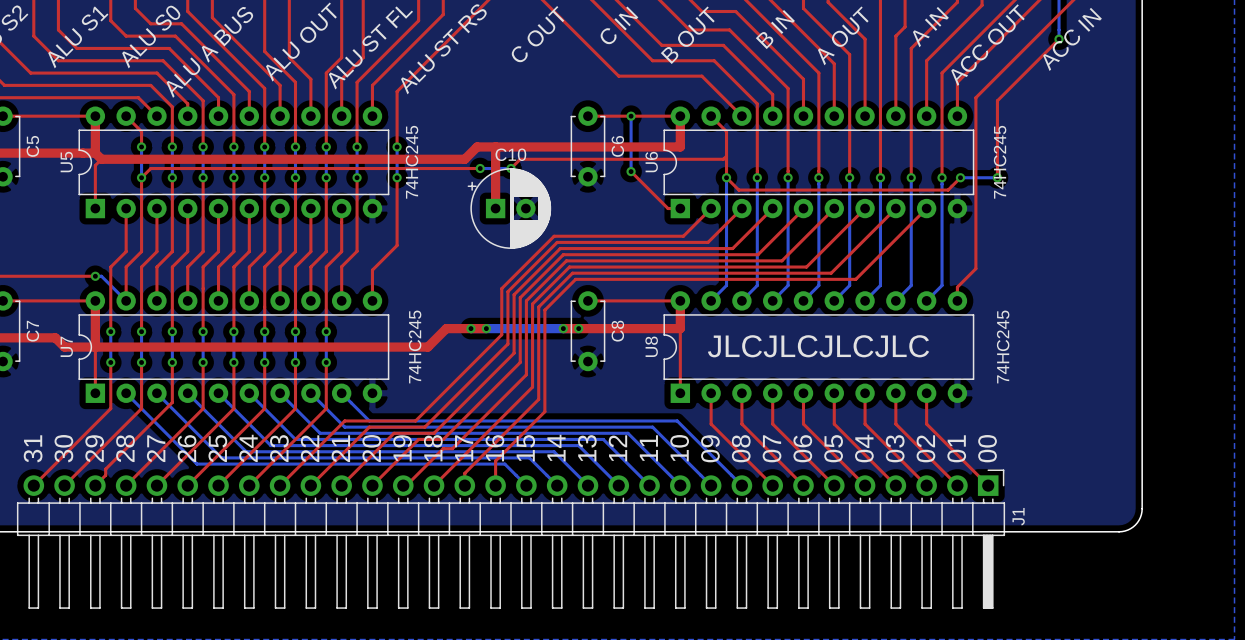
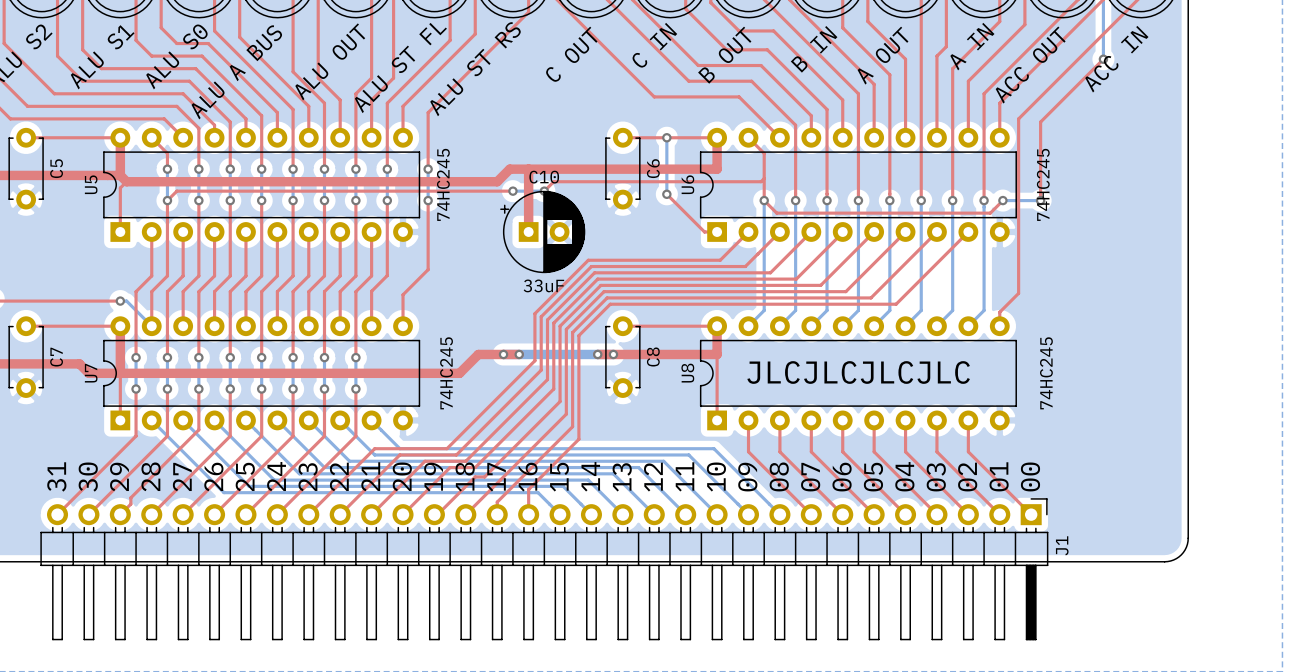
C10 value: none -> 33uF (543, 285)

